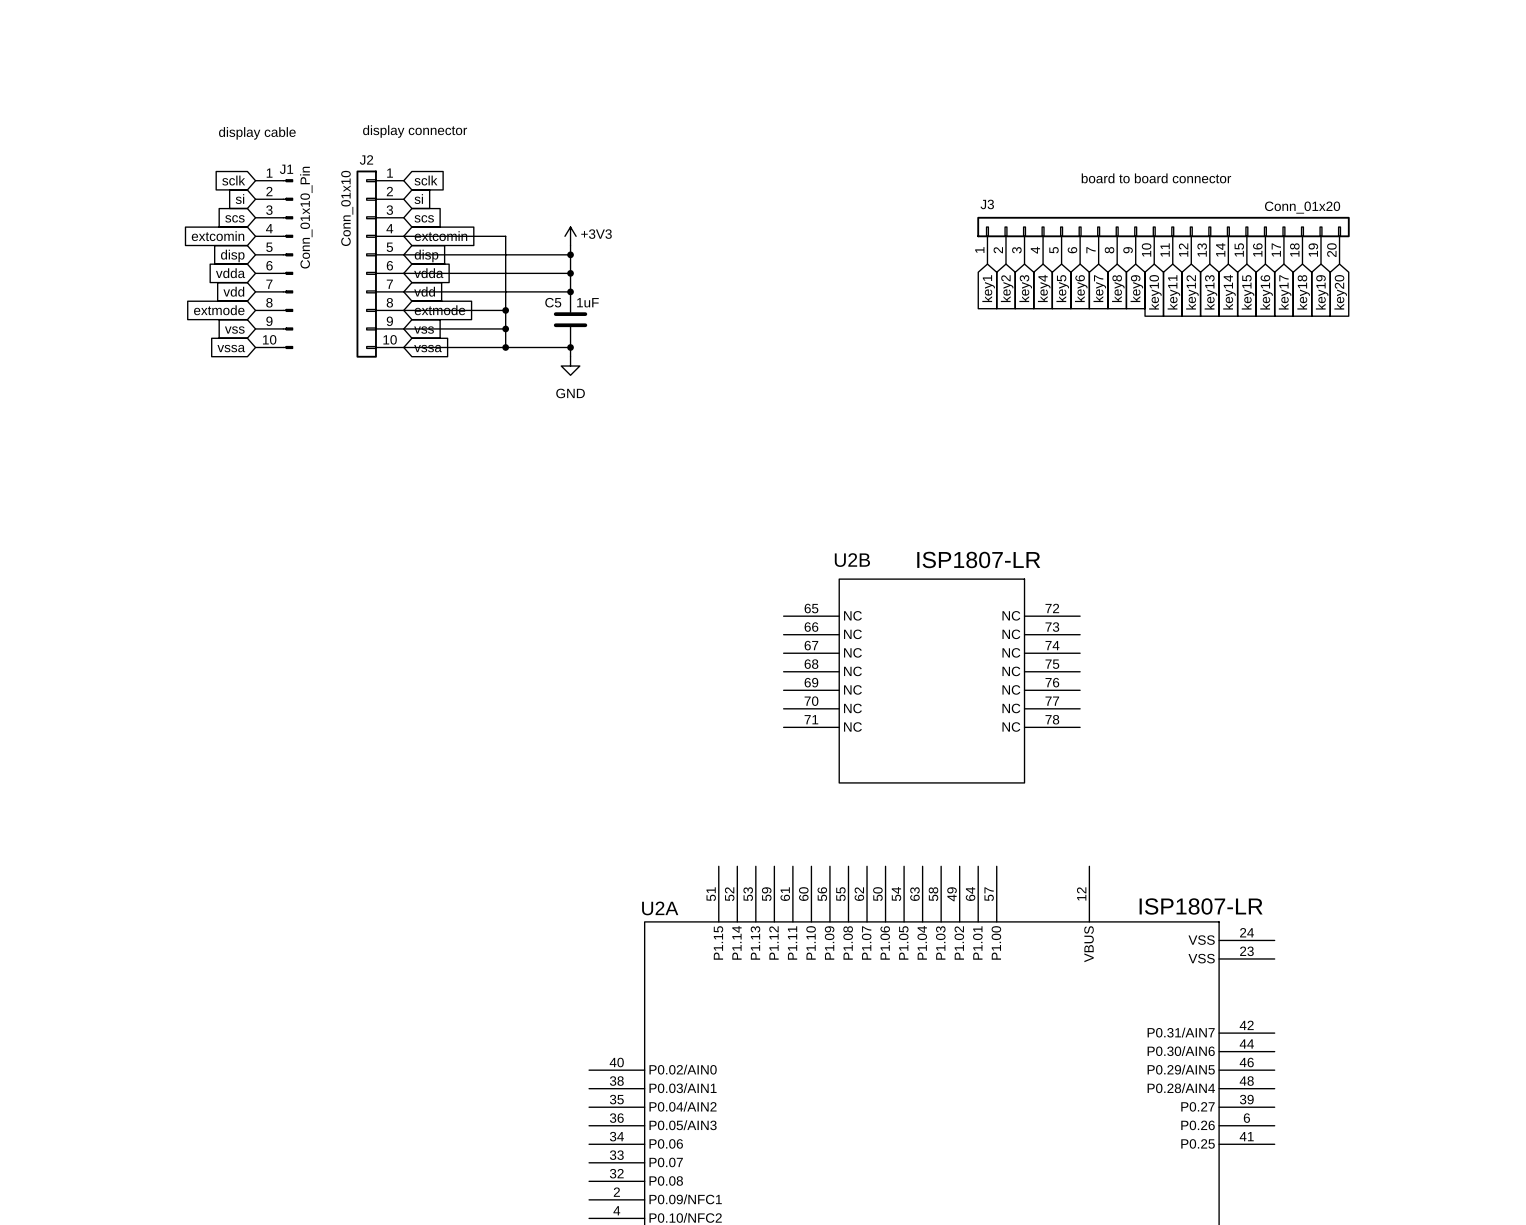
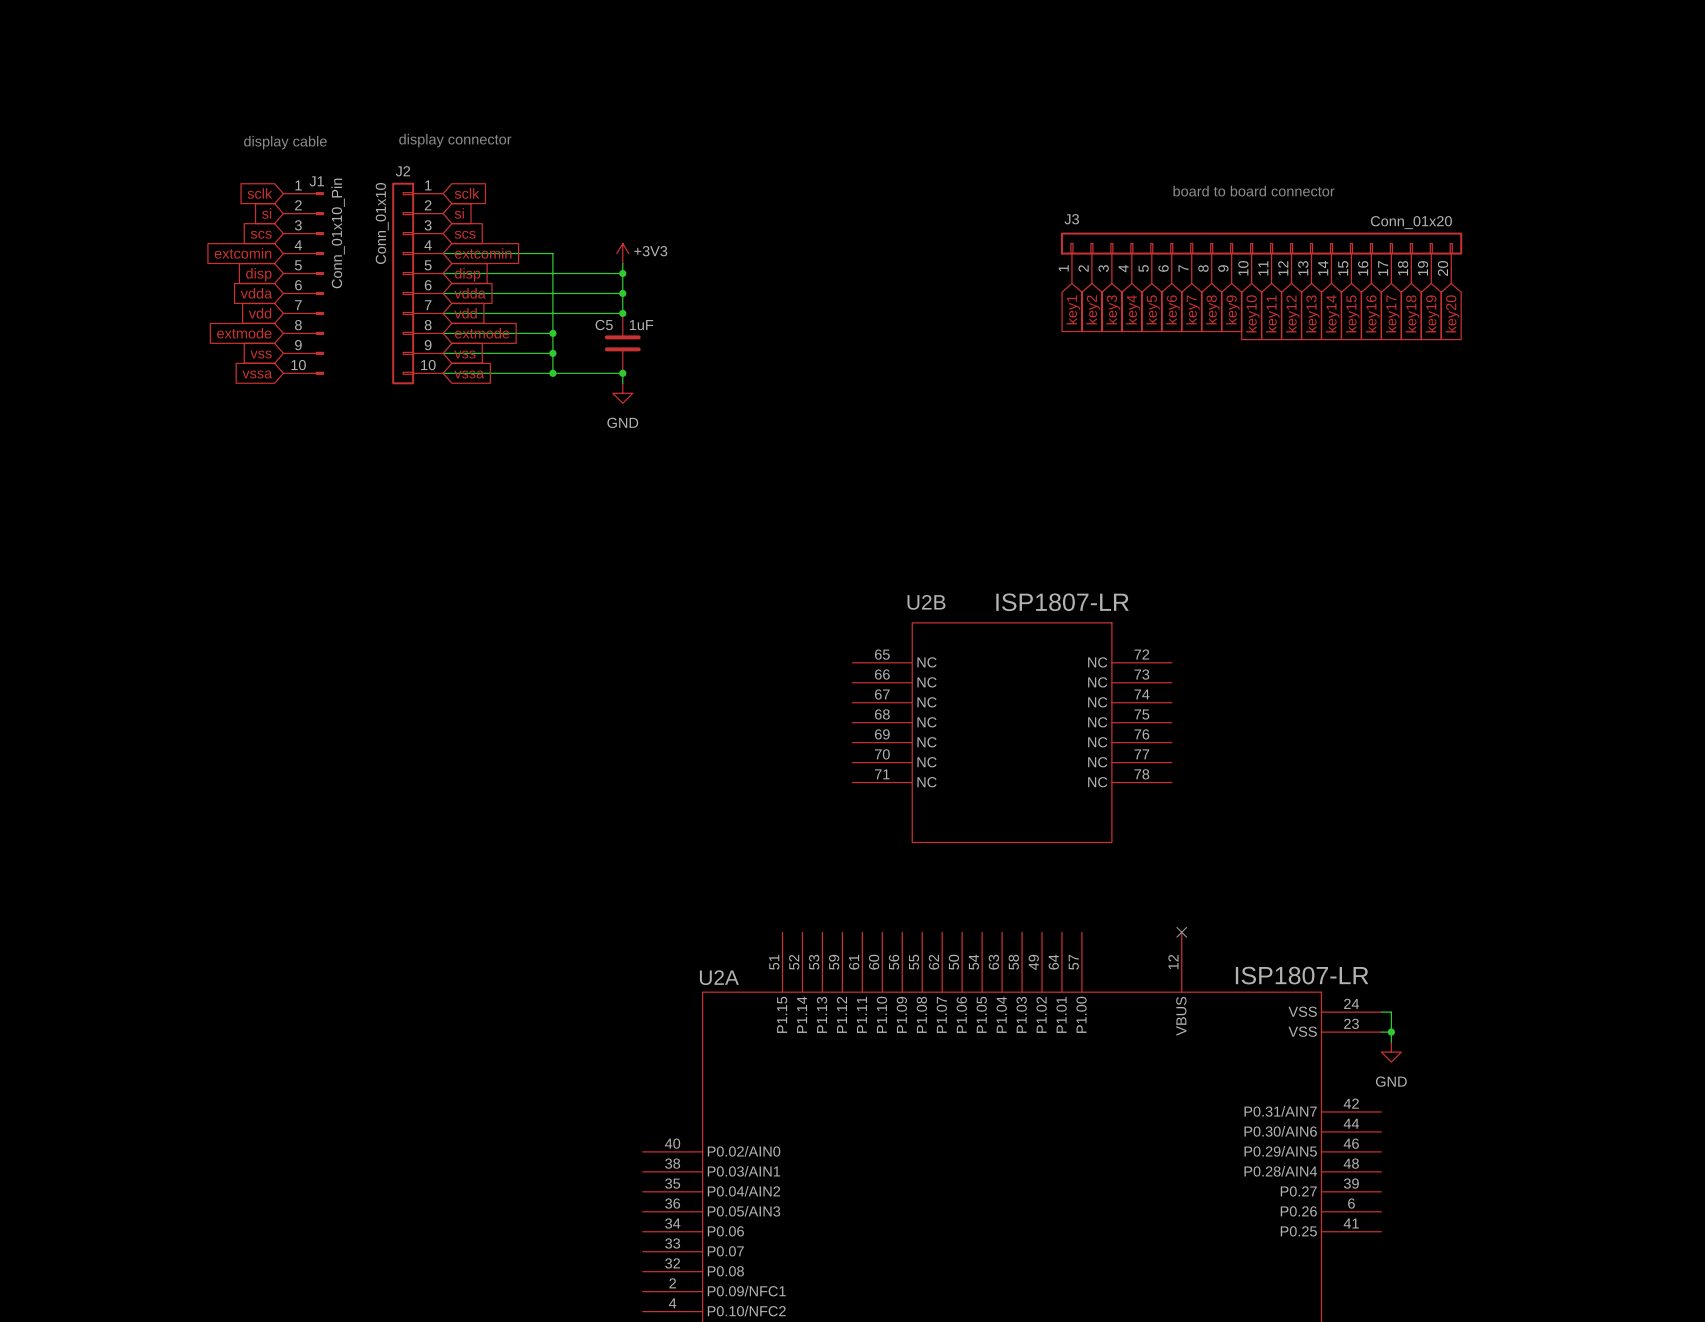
no-connect mark: none -> (1181, 932)
wire: none -> (1381, 1012) (1391, 1012) (1391, 1042)
wire: none -> (1381, 1032) (1391, 1032)
junction: none -> (1391, 1032)
power symbol: none -> GND (1391, 1052)

